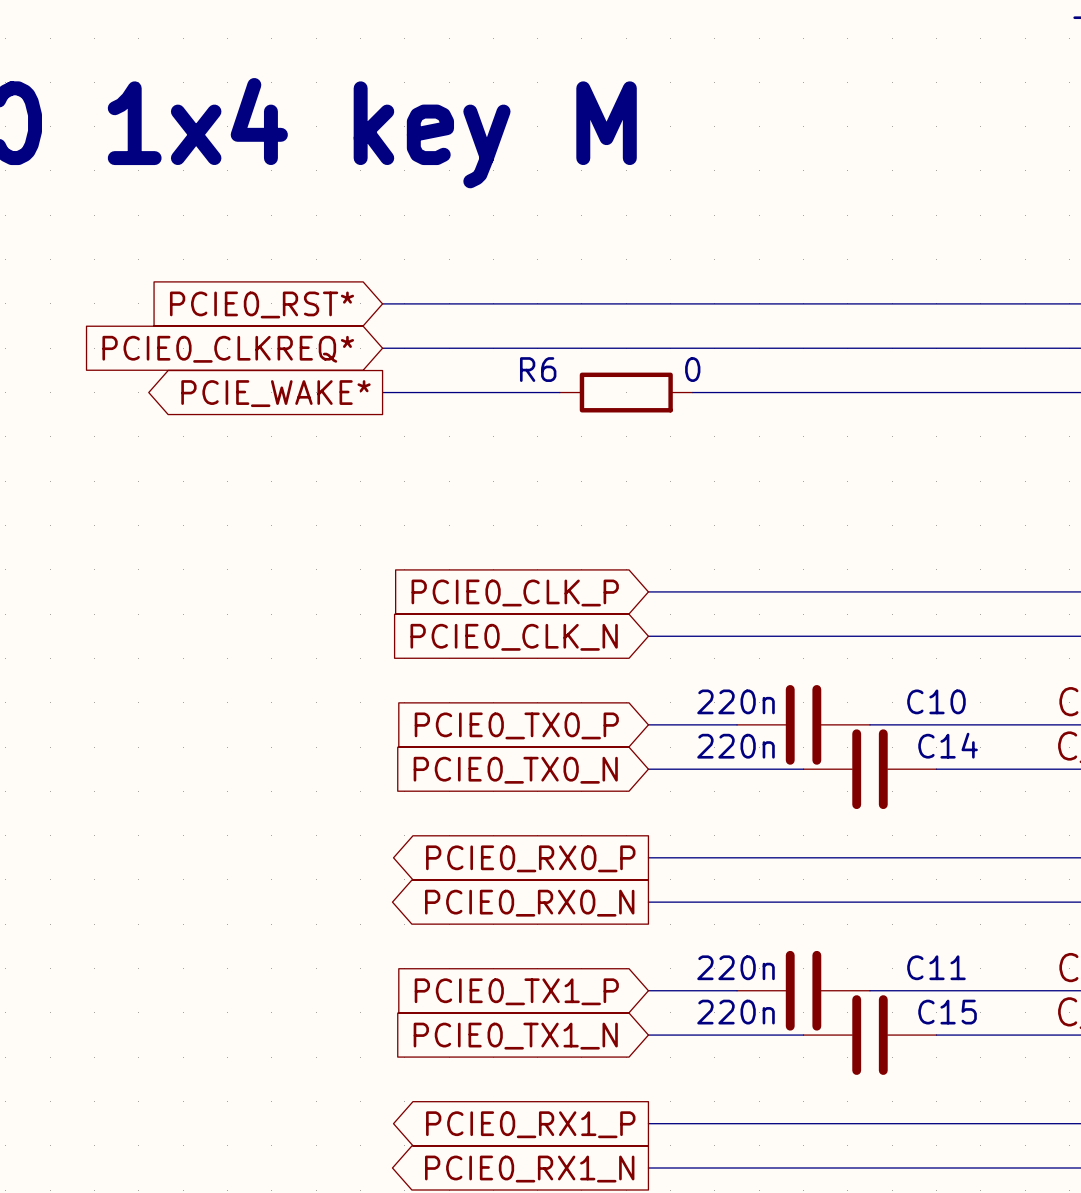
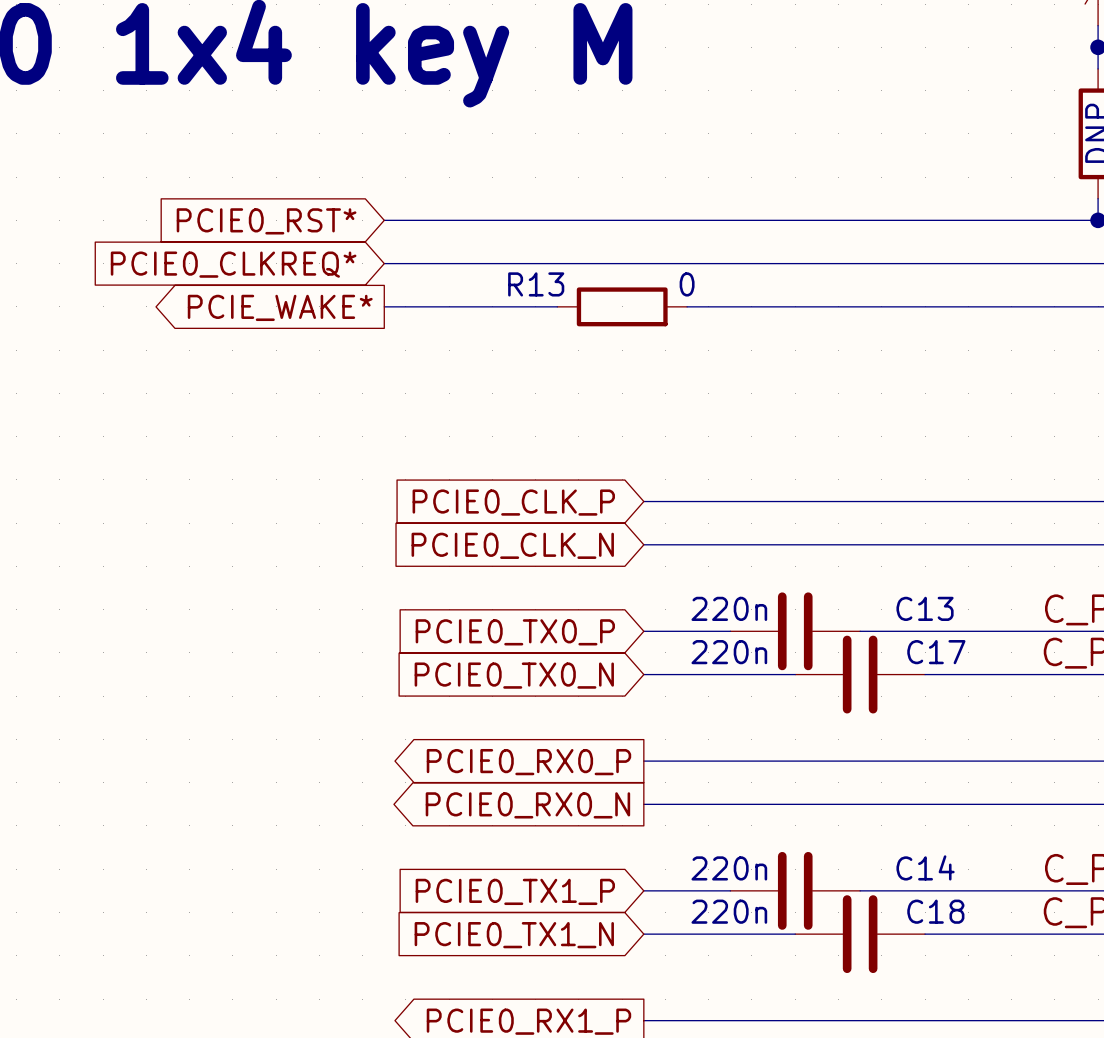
R6 name: R6 (538, 369) -> R13 (536, 284)
C10 name: C10 (936, 701) -> C13 (925, 608)
C14 name: C14 (948, 745) -> C17 (936, 652)
C11 name: C11 (936, 967) -> C14 (925, 867)
C15 name: C15 (947, 1012) -> C18 (935, 911)

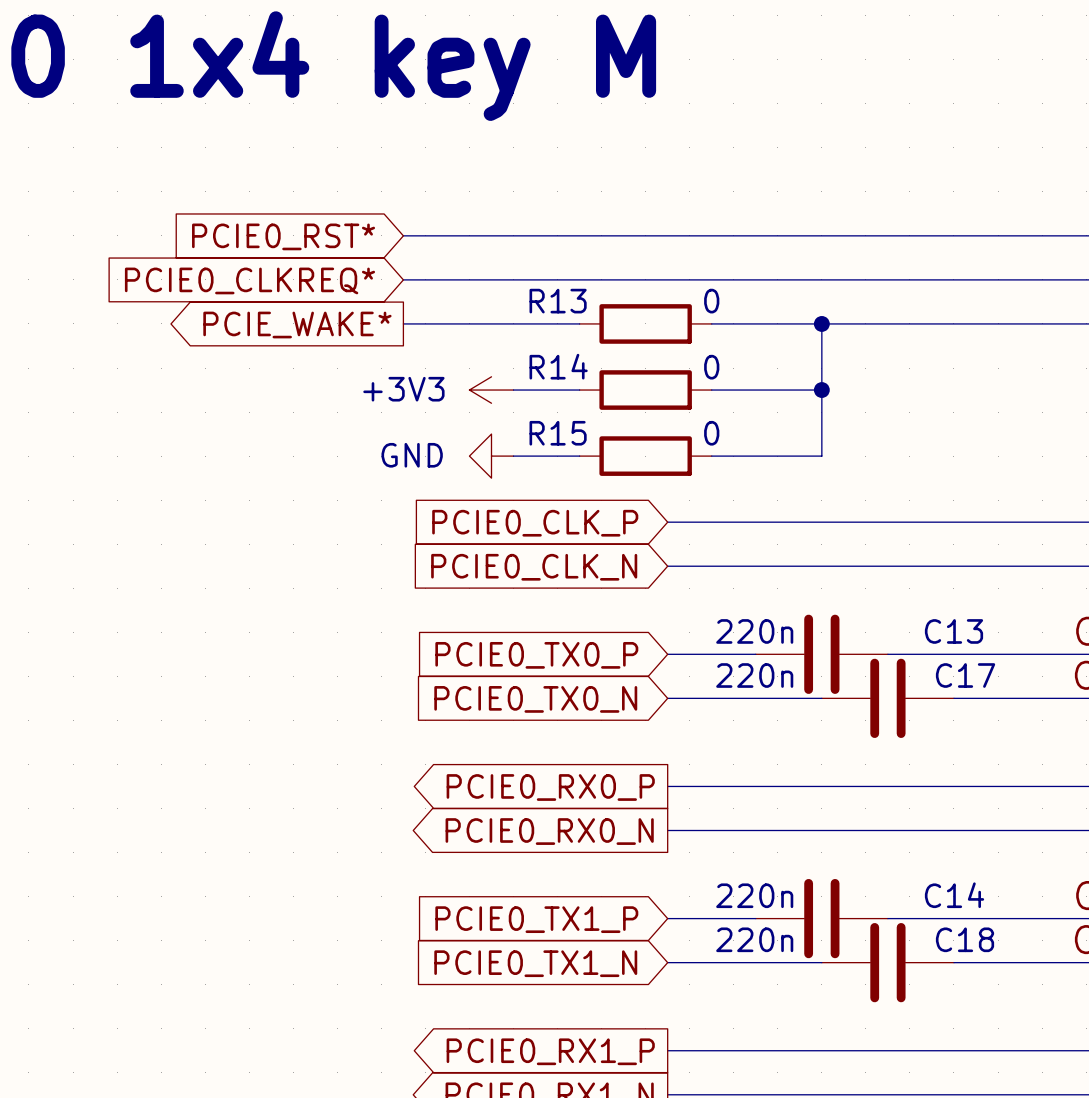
wire: none -> (821, 323) (821, 456) (711, 456)
junction: none -> (821, 323)
power symbol: none -> +3V3 (491, 390)
wire: none -> (513, 390) (579, 390)
R14: none -> 0 (645, 390)
wire: none -> (711, 390) (821, 390)
junction: none -> (821, 390)
power symbol: none -> GND (491, 456)
wire: none -> (513, 456) (579, 456)
R15: none -> 0 (645, 456)

